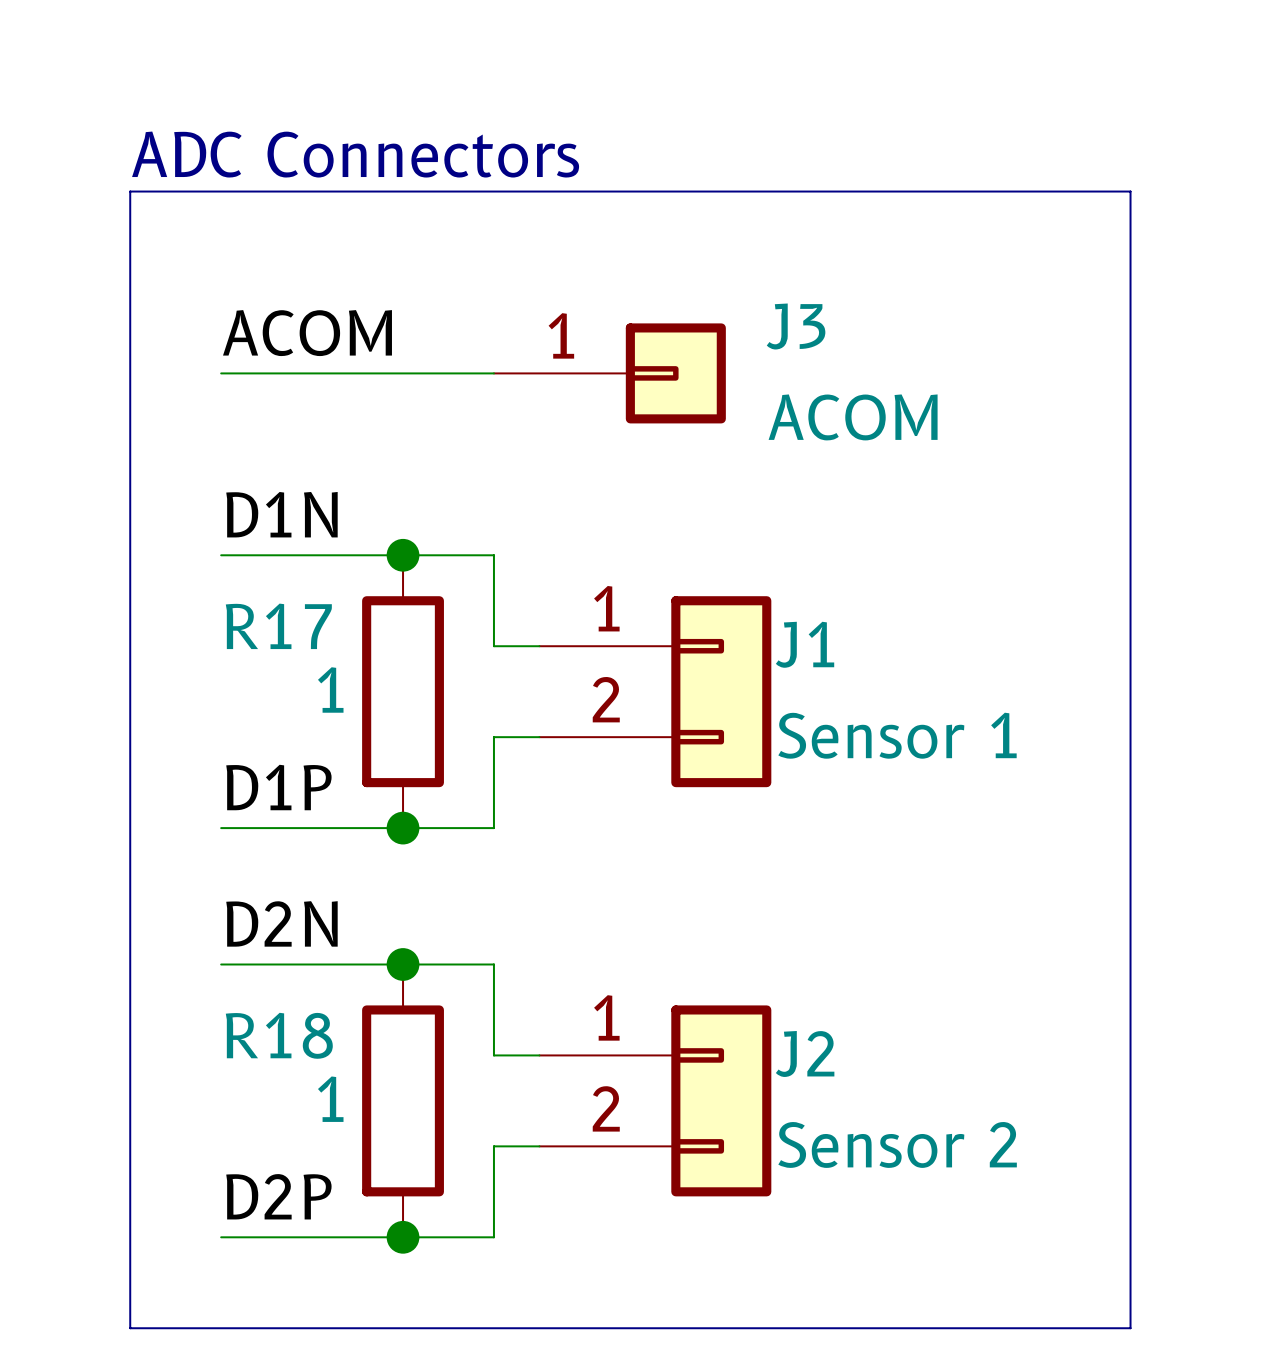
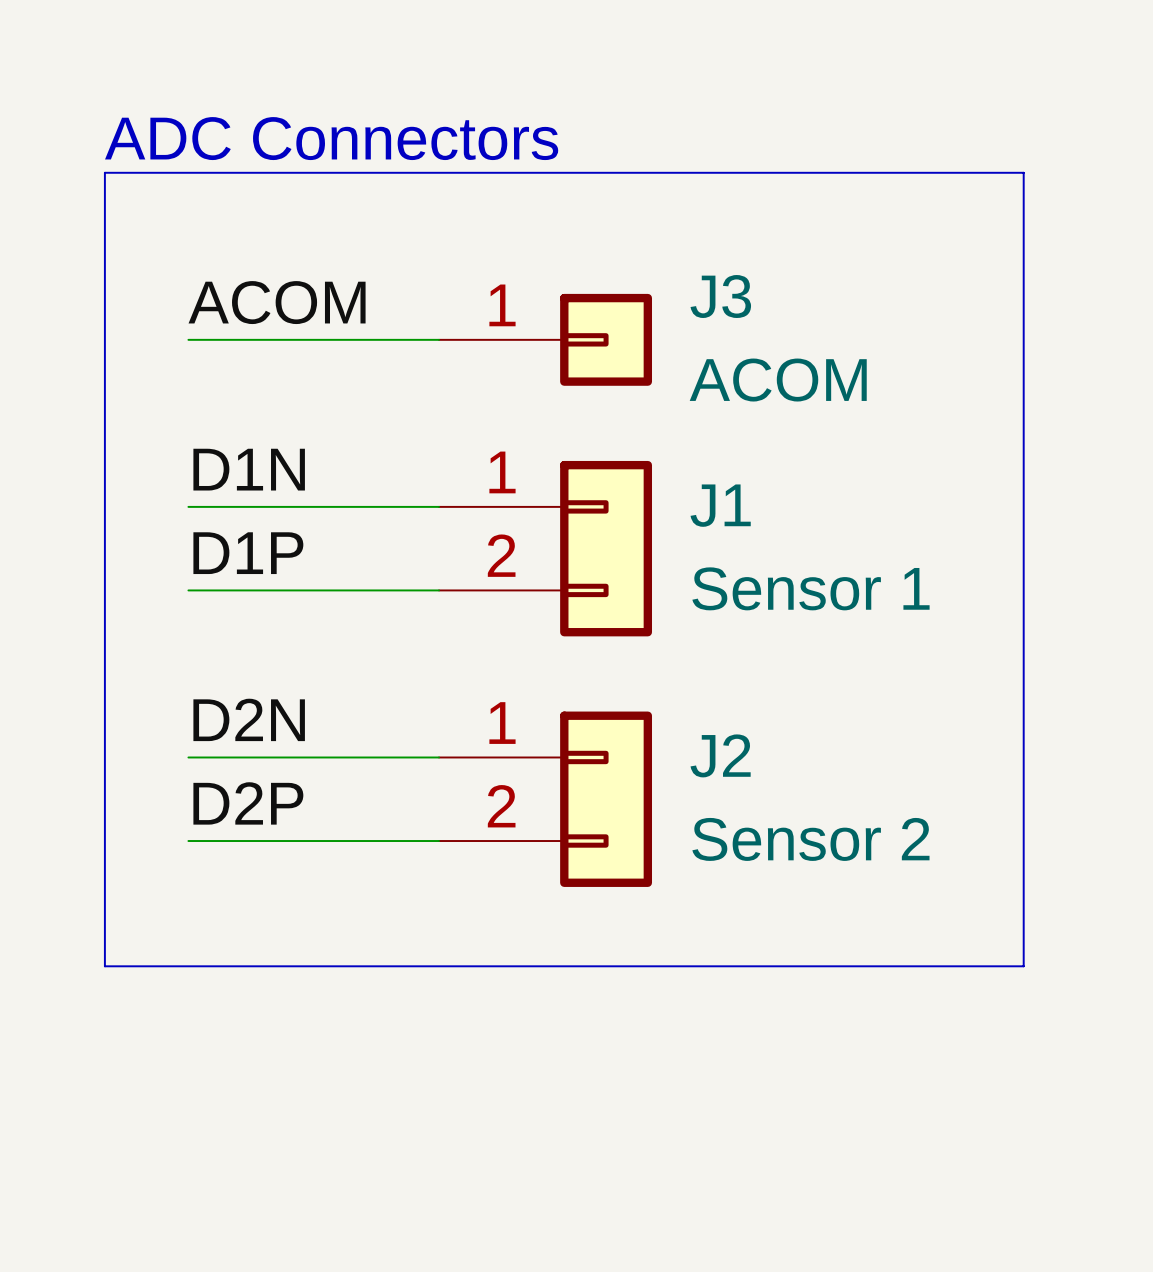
junction: (403, 555) -> none
wire: (493, 555) (493, 646) (539, 646) -> none
label: none -> D1P (248, 553)
J1 name position: J1 (805, 644) -> J1 (720, 505)
wire: none -> (188, 590) (439, 590)
R17: 1 (403, 691) -> none
J1 position: (655, 691) -> (545, 548)
J1 value position: Sensor 1 (897, 735) -> Sensor 1 (810, 588)
wire: (539, 737) (493, 737) (493, 828) -> none
label: D1P (278, 787) -> D2N (249, 719)
junction: (403, 828) -> none
wire: none -> (188, 841) (439, 841)
label: D2N (281, 923) -> none
wire: (221, 964) (493, 964) (493, 1055) (539, 1055) -> none
junction: (403, 964) -> none
J2 name position: J2 (805, 1053) -> J2 (720, 755)
line: (130, 1055) (130, 1328) (1130, 1328) (1130, 1055) -> (104, 966) (1023, 966)
R18: 1 (403, 1100) -> none
J2 position: (655, 1100) -> (545, 799)
J2 value position: Sensor 2 (897, 1144) -> Sensor 2 (810, 839)
wire: (539, 1146) (493, 1146) (493, 1237) (221, 1237) -> none
label position: D2P (278, 1196) -> D2P (248, 803)
junction: (403, 1237) -> none

